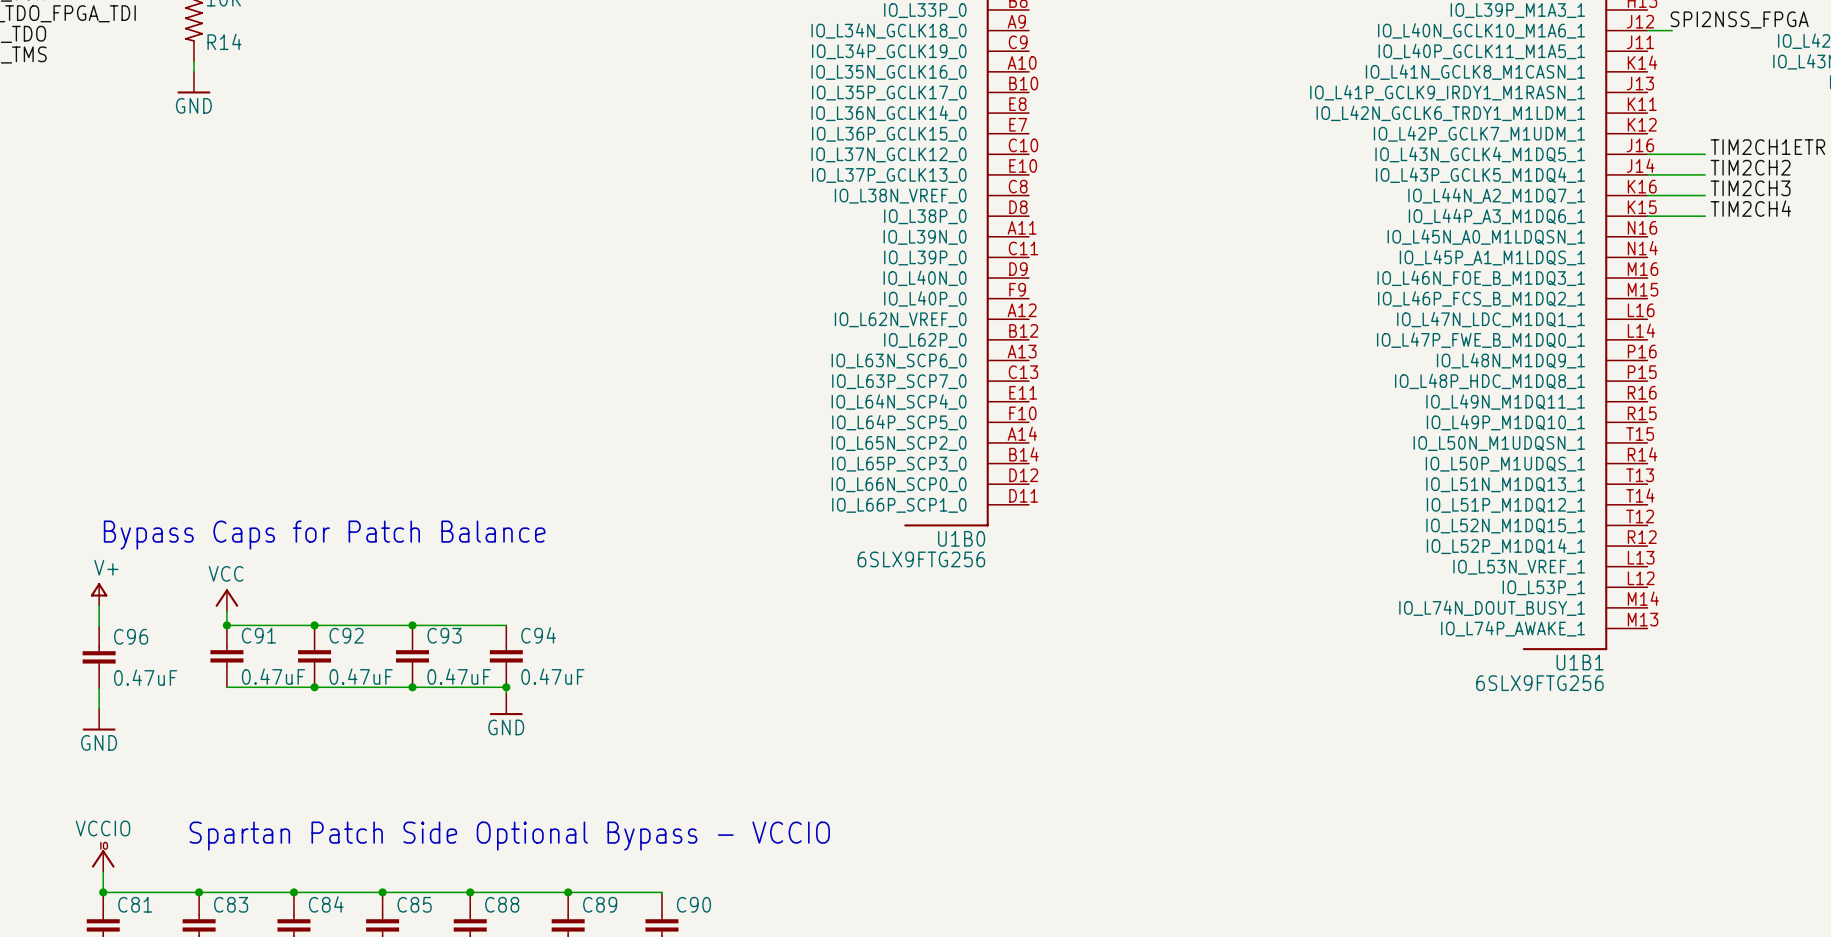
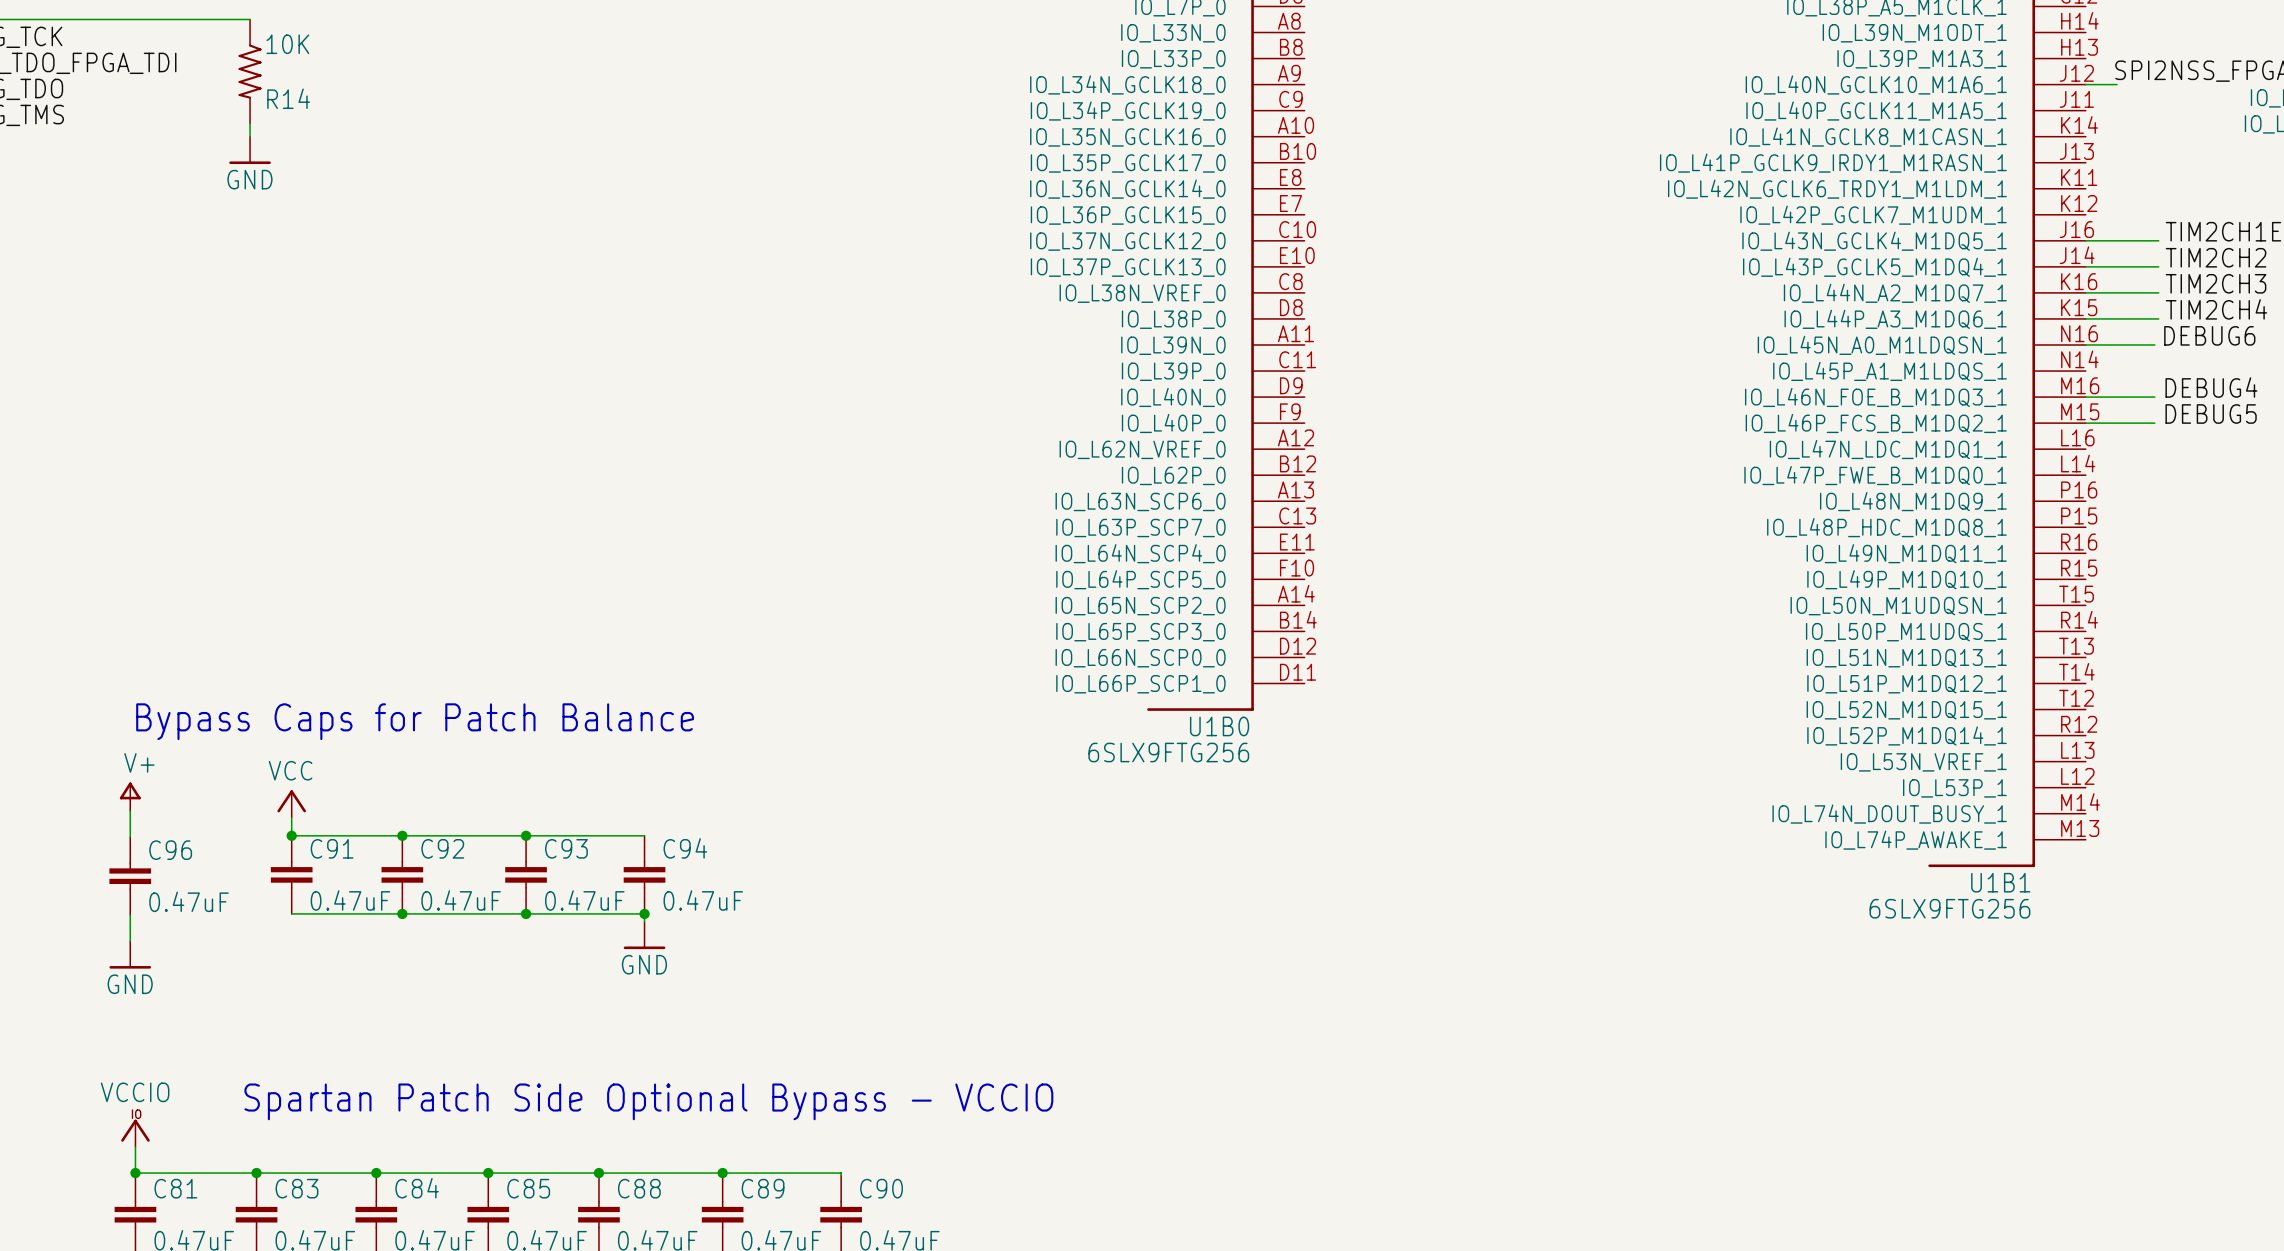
label: none -> DEBUG6 (2209, 335)
wire: none -> (2085, 344) (2154, 344)
label: none -> DEBUG4 (2211, 387)
wire: none -> (2085, 397) (2154, 397)
label: none -> DEBUG5 (2211, 413)
wire: none -> (2085, 423) (2154, 423)

